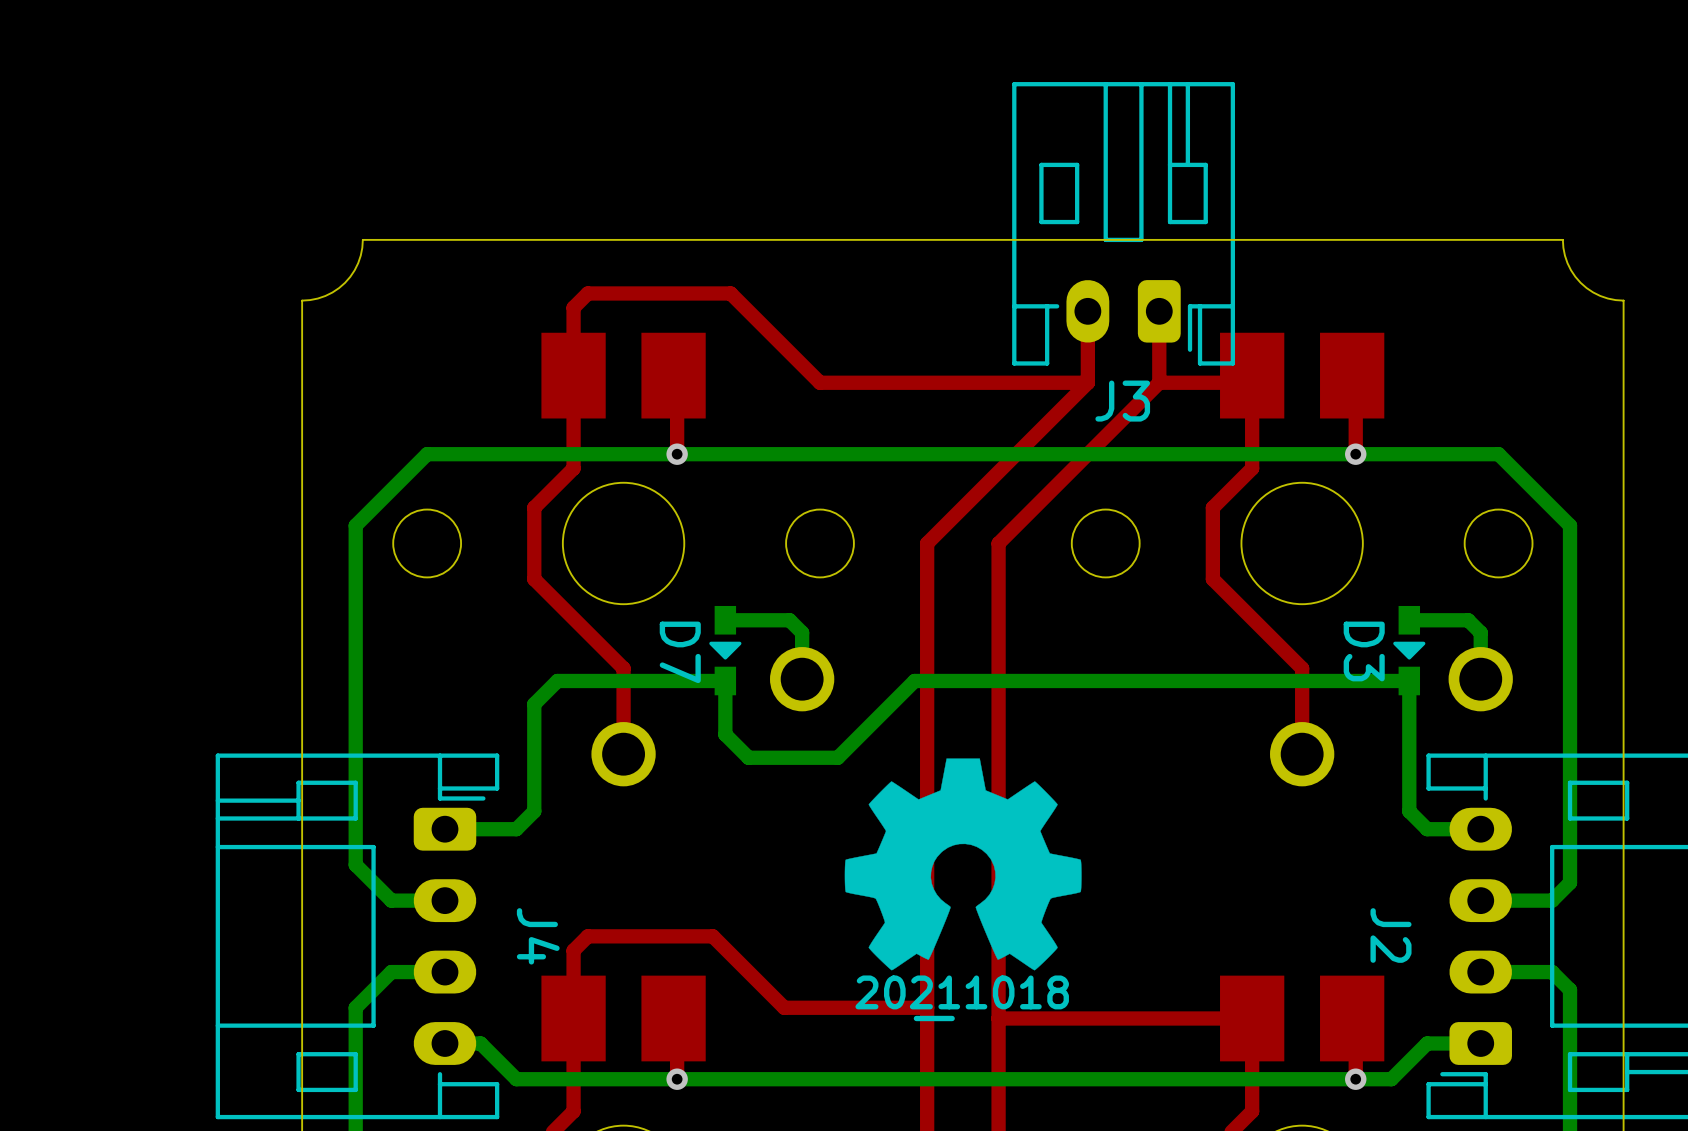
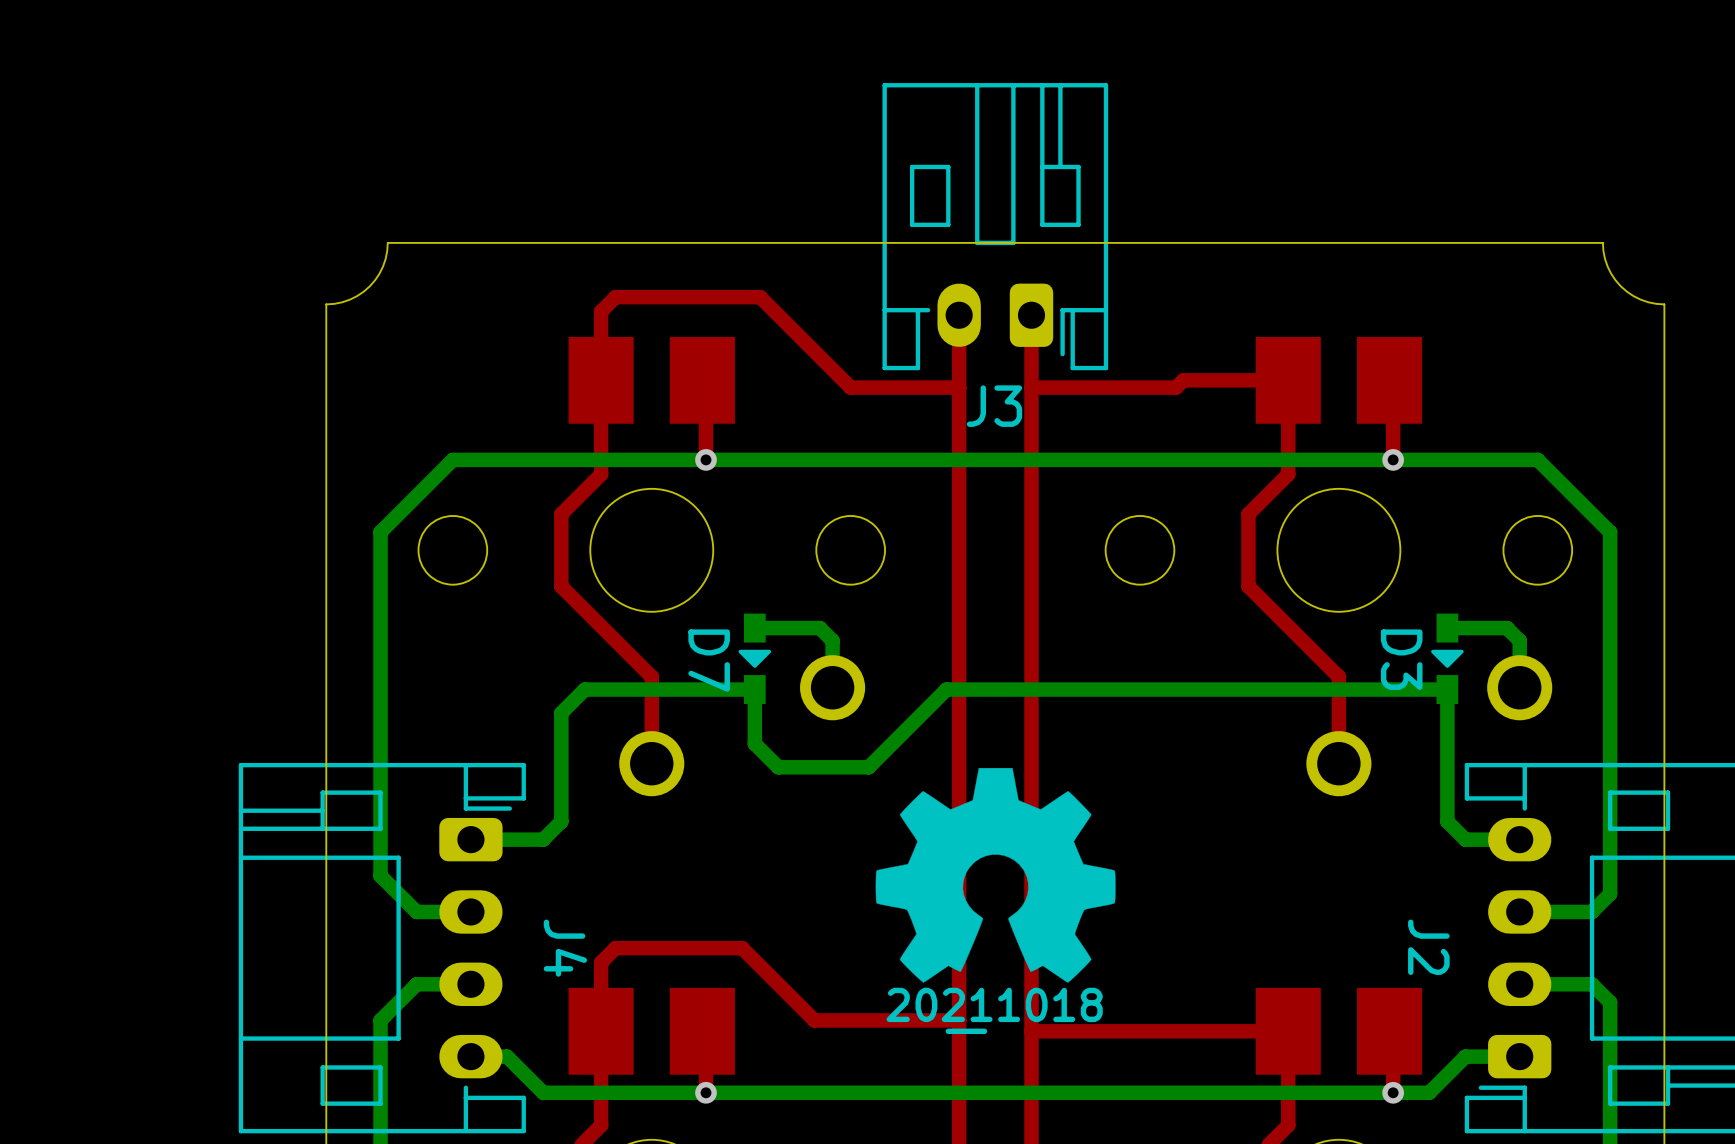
J3 position: (1123, 223) -> (995, 226)
top track: (1087, 311) (1087, 382) (927, 543) -> (959, 315) (959, 550)
top track: (1159, 311) (1159, 382) -> none
top track: (1252, 375) (1245, 382) (1159, 382) -> (1288, 380) (1183, 380) (1176, 387) (1121, 387)
top track: (998, 382) (927, 382) -> none
top track: (1159, 382) (998, 543) -> (1031, 315) (1031, 550)

